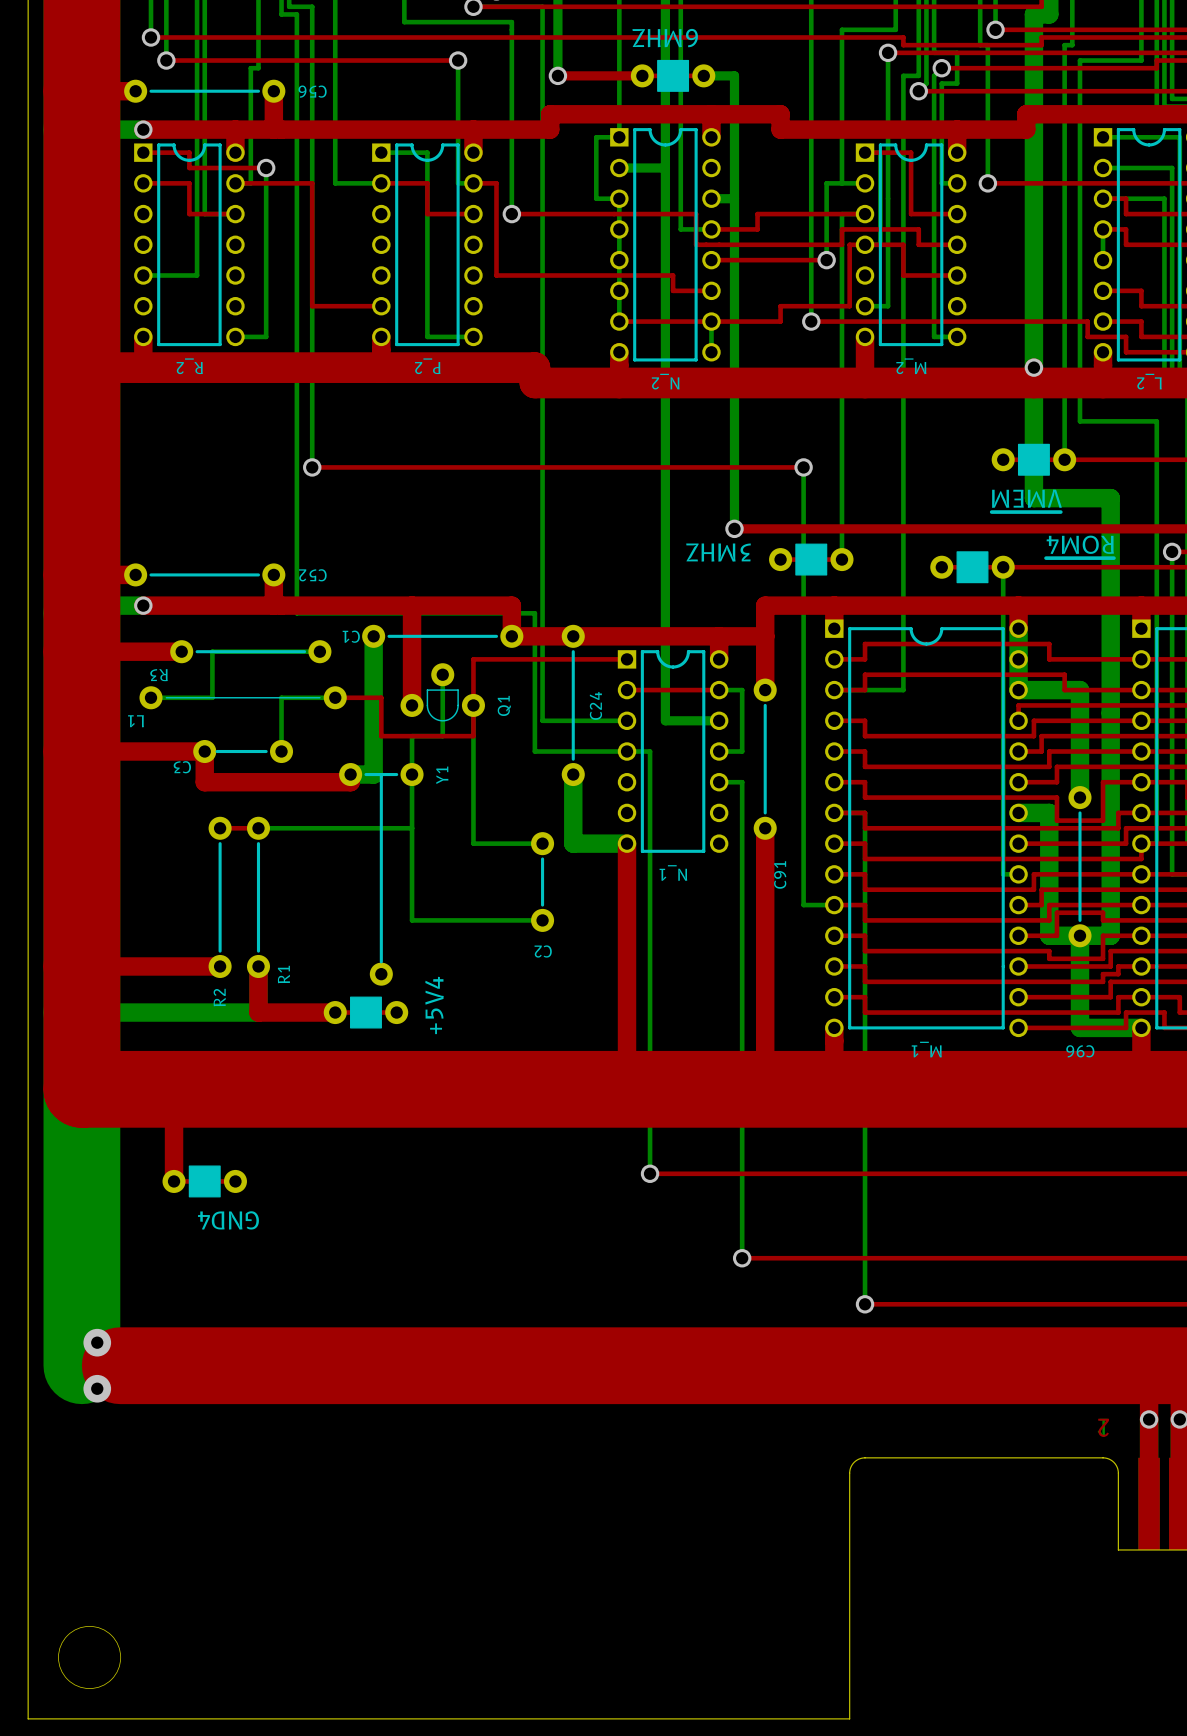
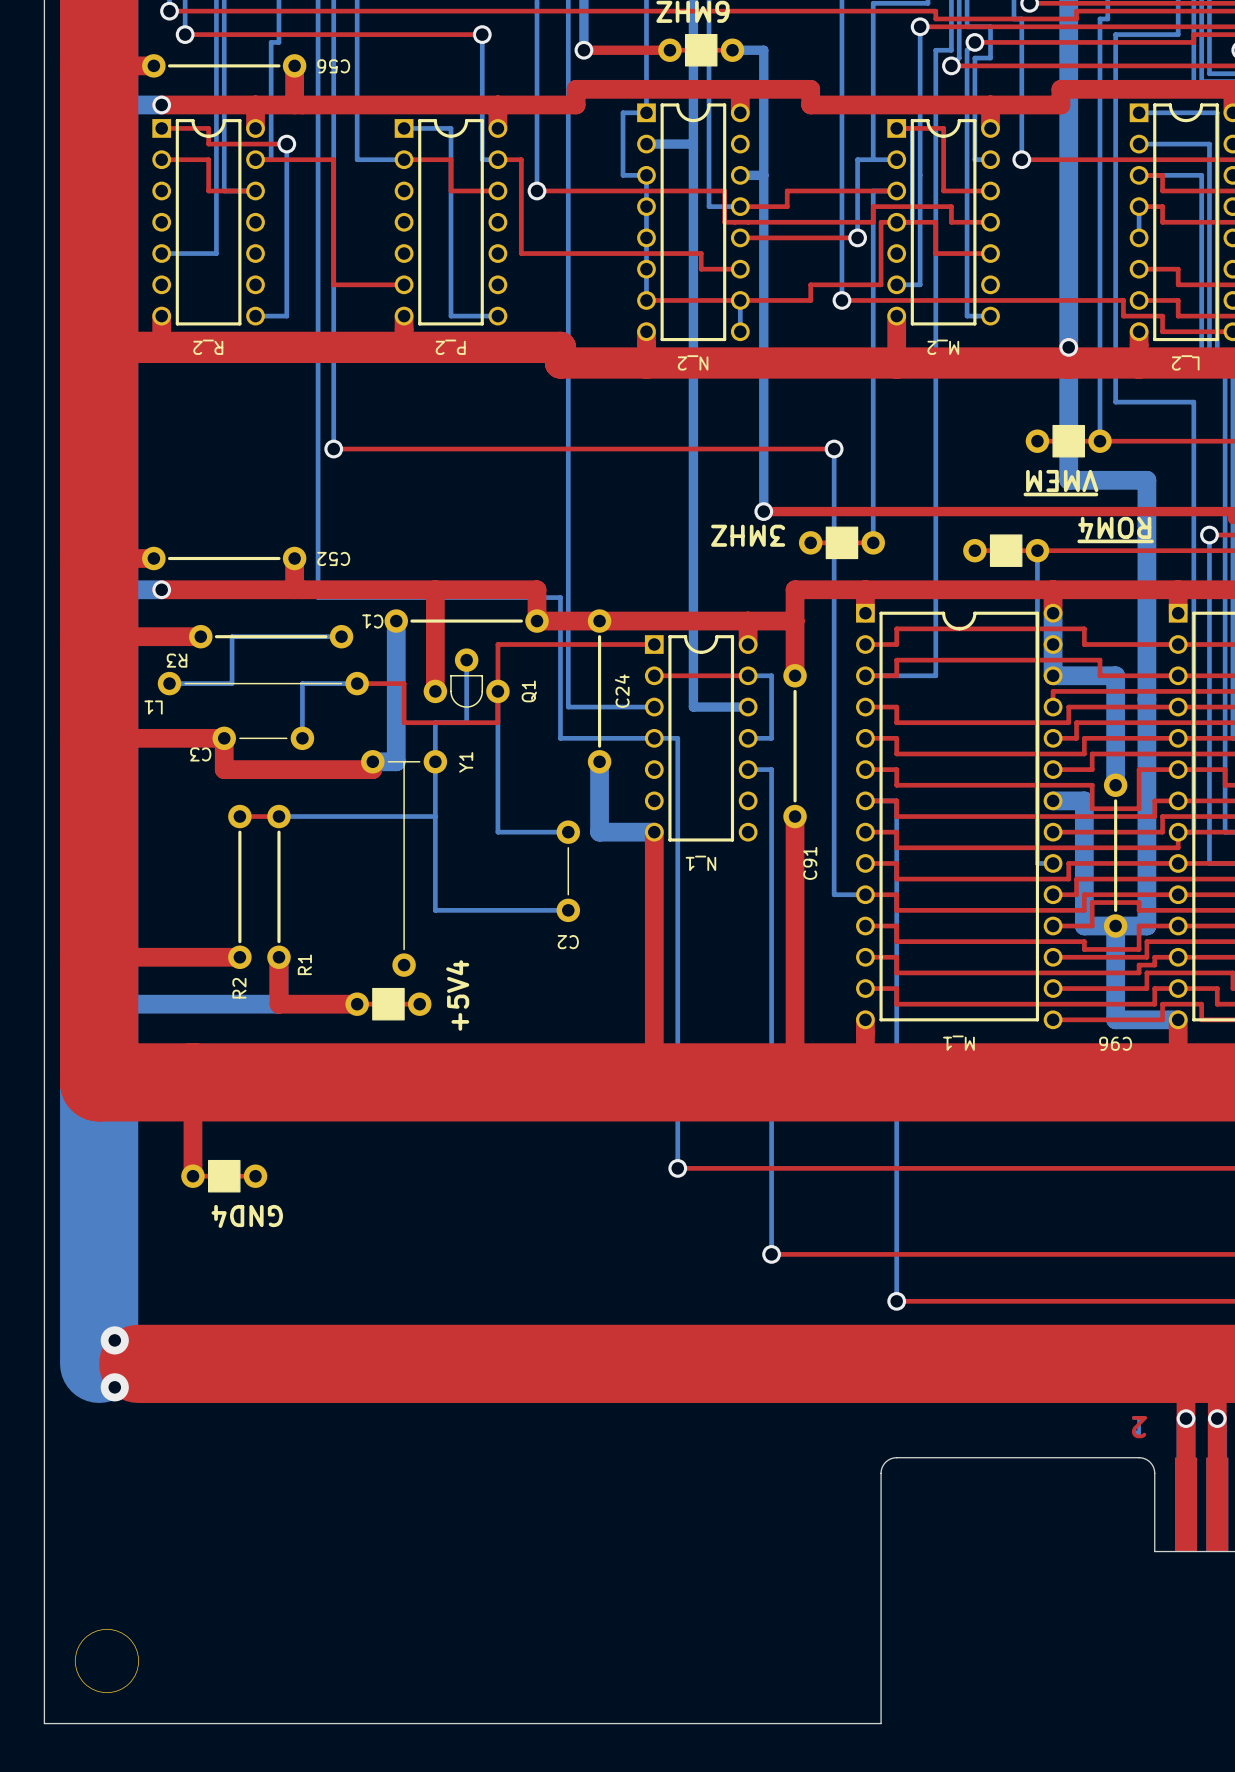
line: (217, 751) (266, 751) -> none
line: (365, 774) (396, 774) -> none
line: (381, 774) (381, 961) -> none
line: (542, 858) (542, 905) -> none

